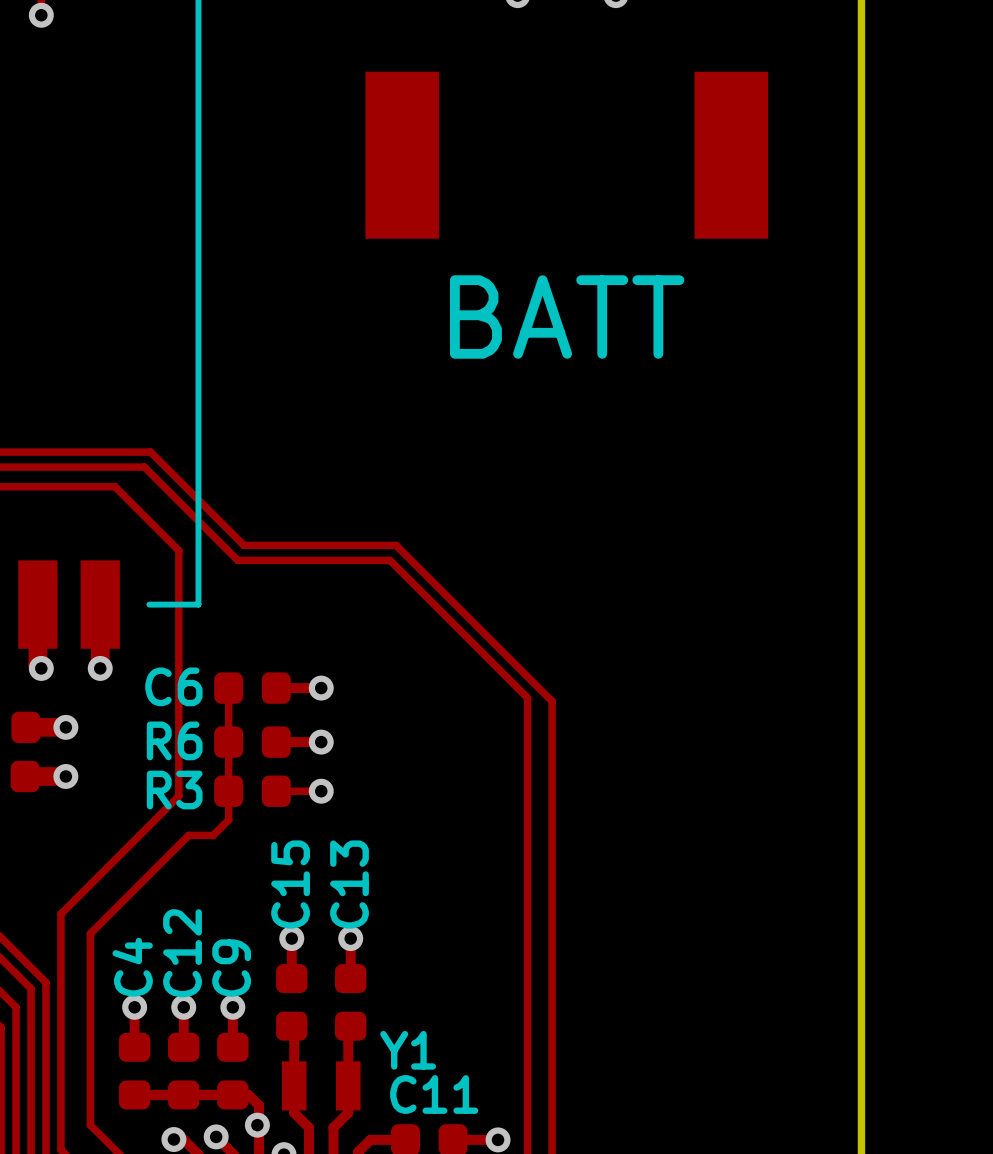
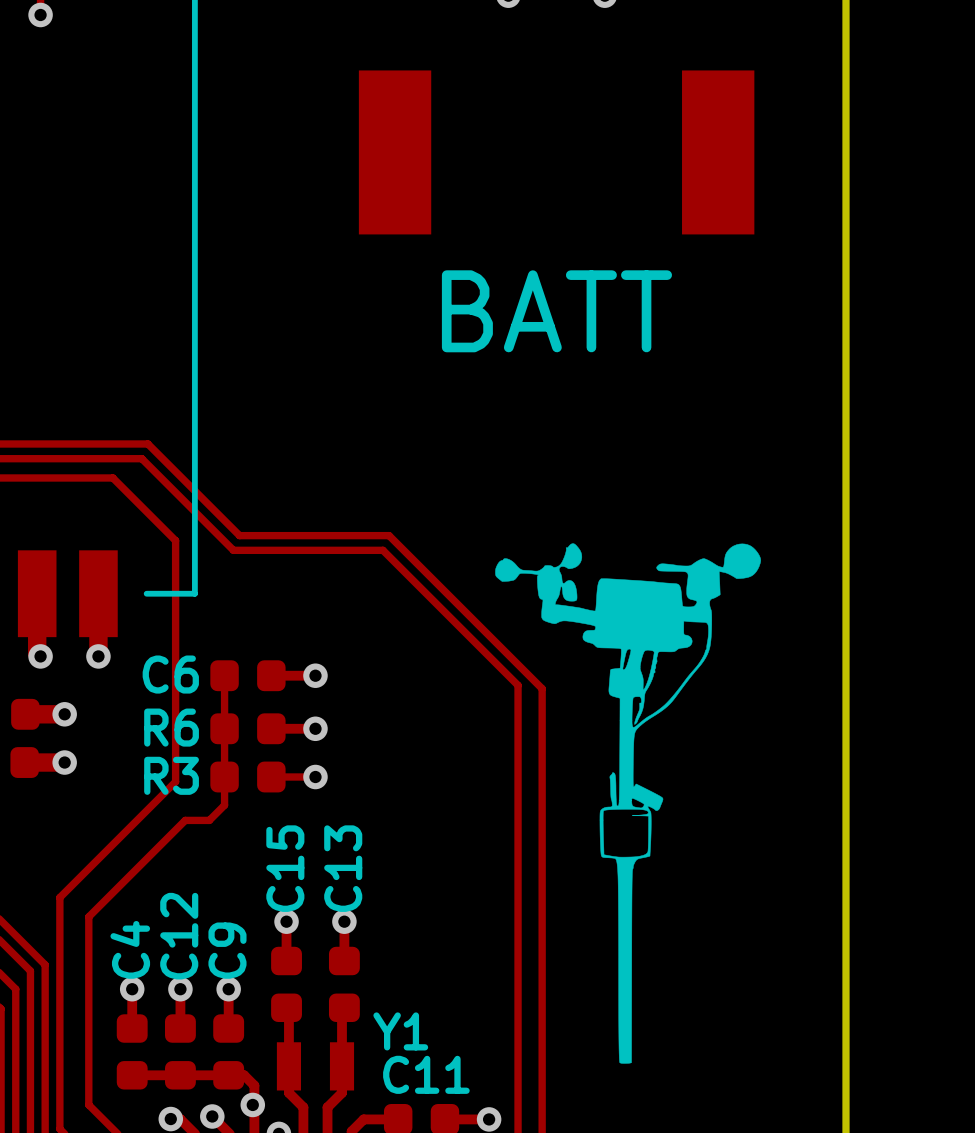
drawing: none -> [495, 543, 762, 1064]

